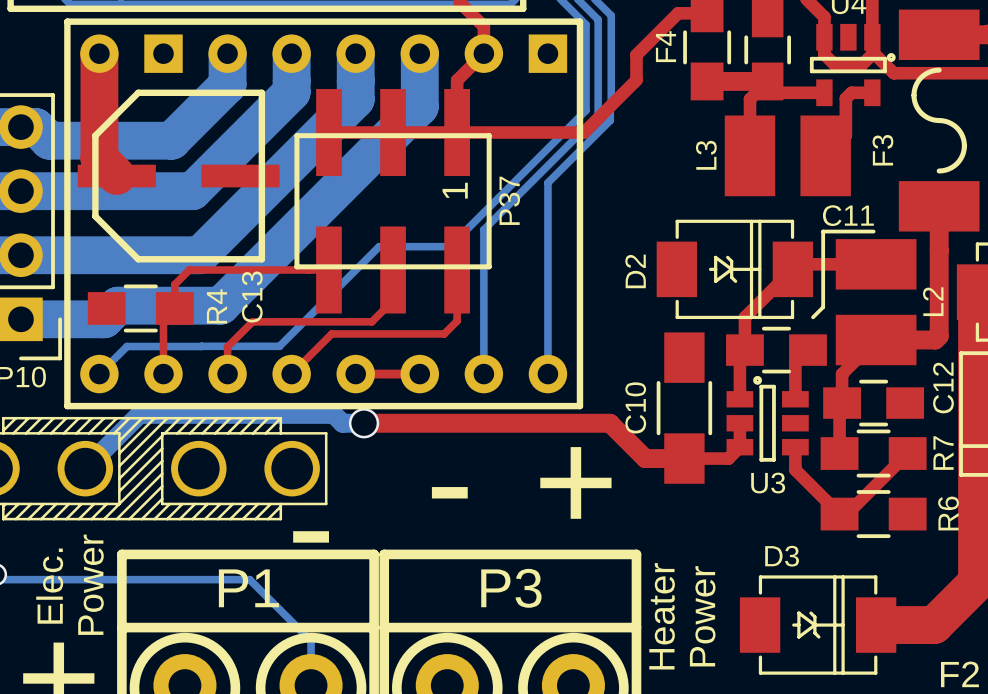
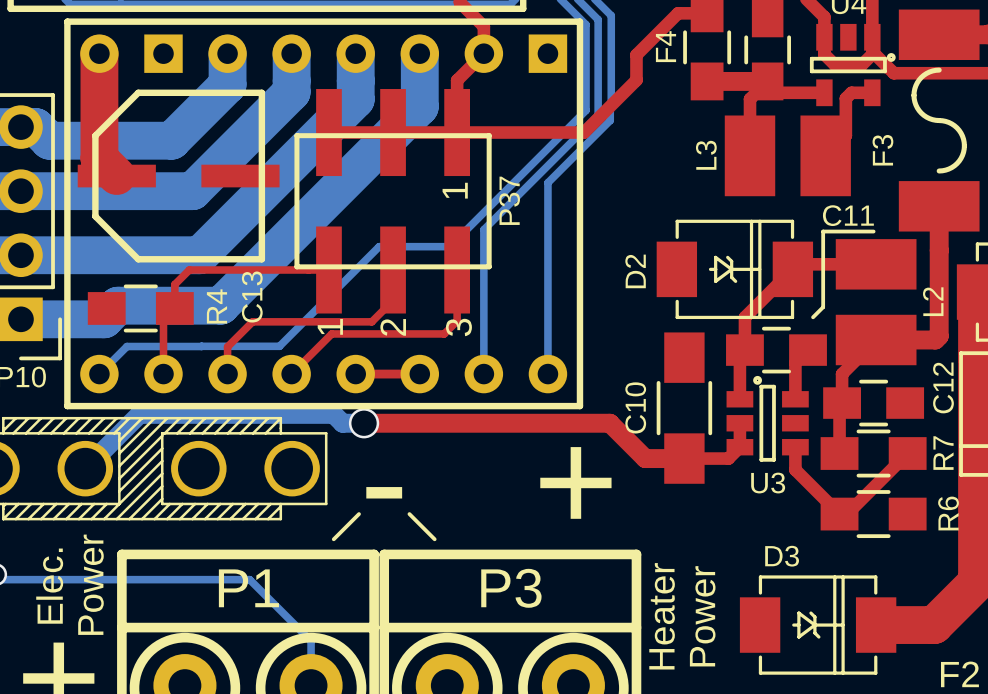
text: none -> 1 (330, 326)
text: none -> 2 (393, 327)
text: none -> 3 (458, 327)
text: none -> - (384, 492)
text: - (449, 492) -> none
line: none -> (359, 514) (333, 539)
line: none -> (409, 514) (434, 539)
text: - (311, 536) -> none

